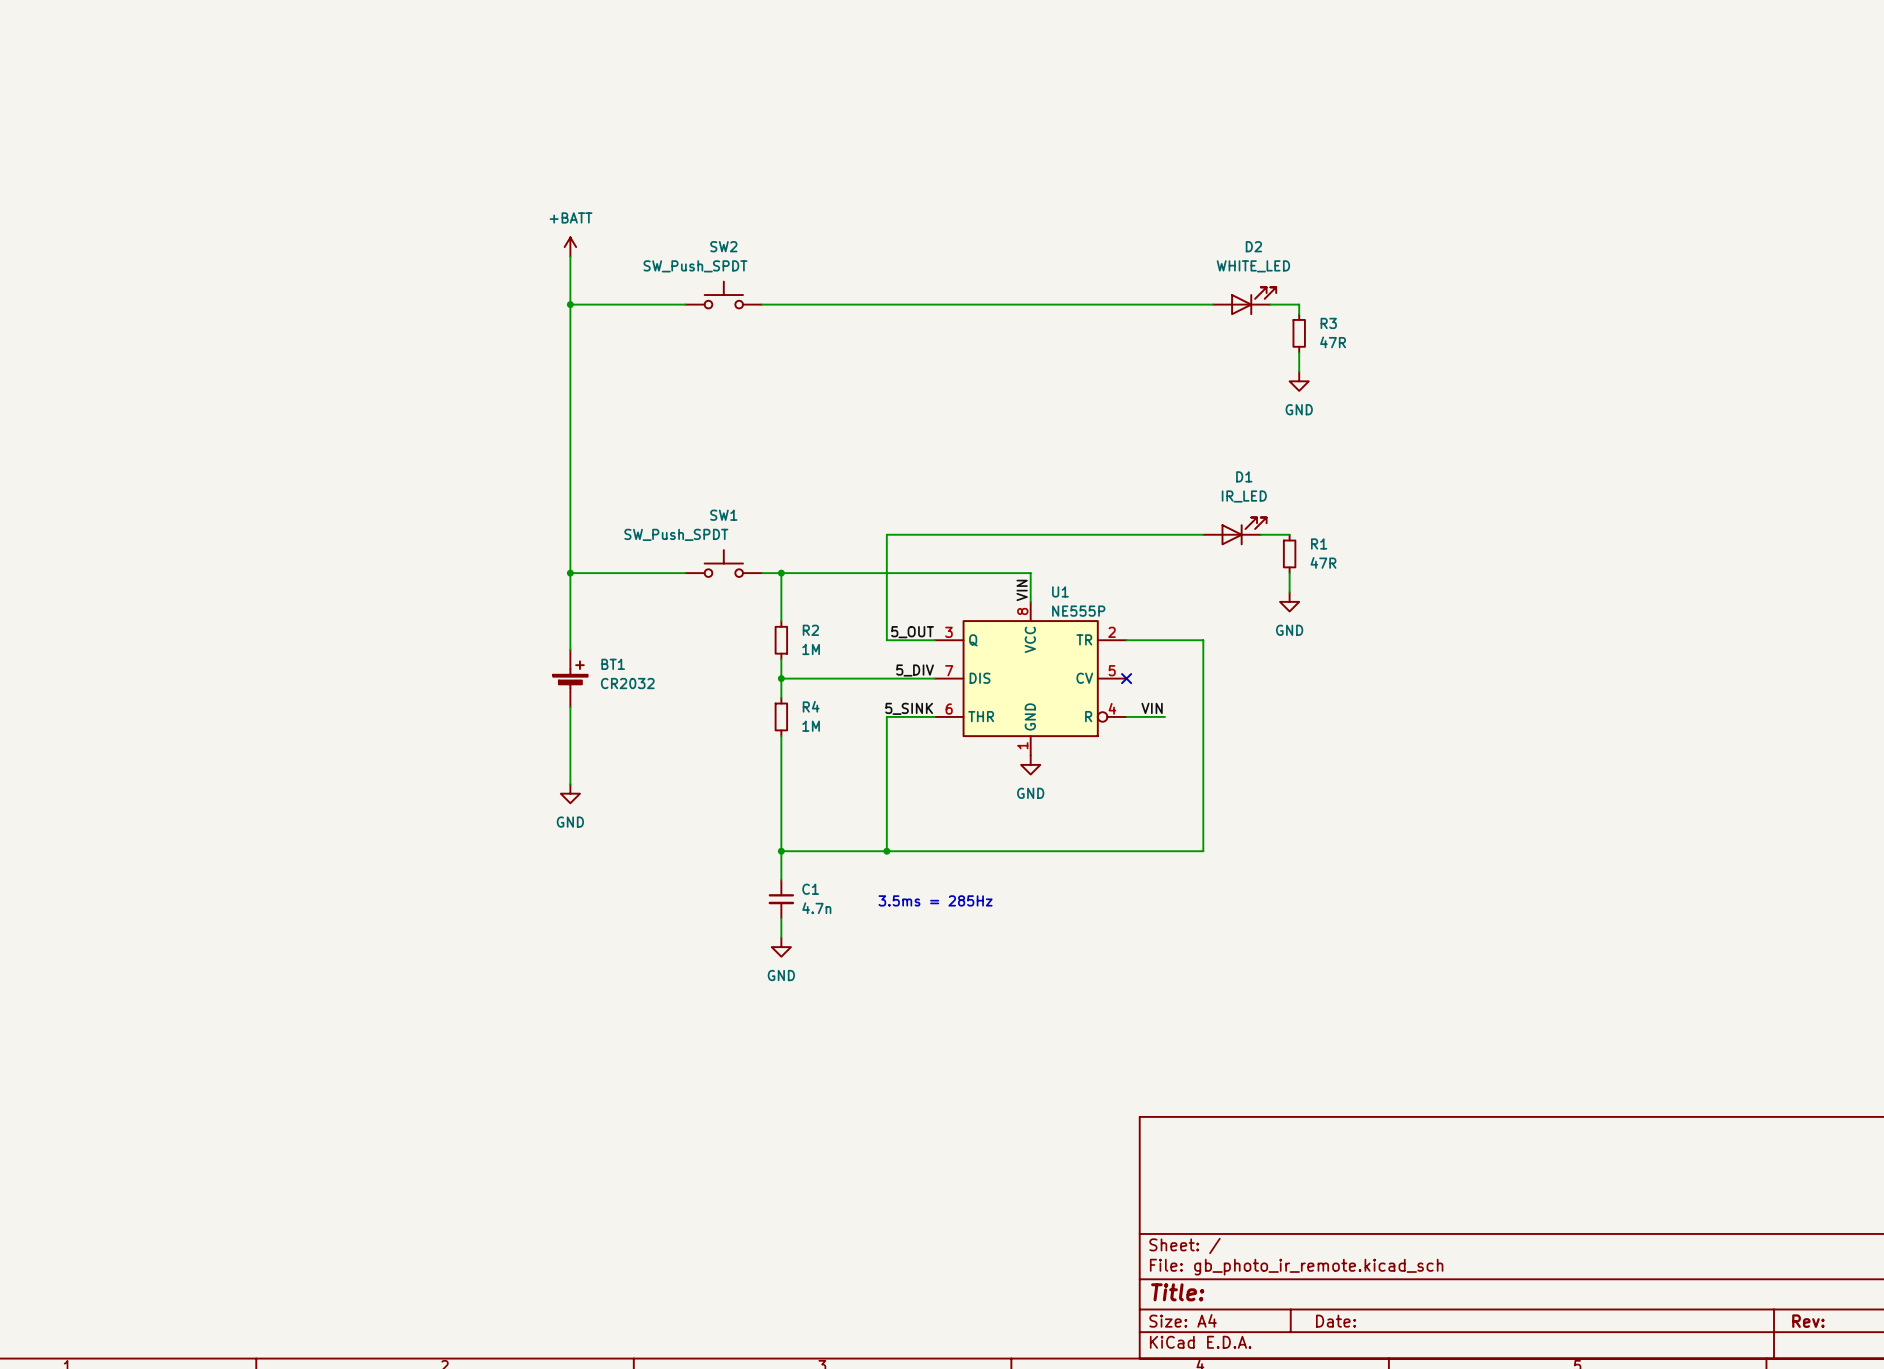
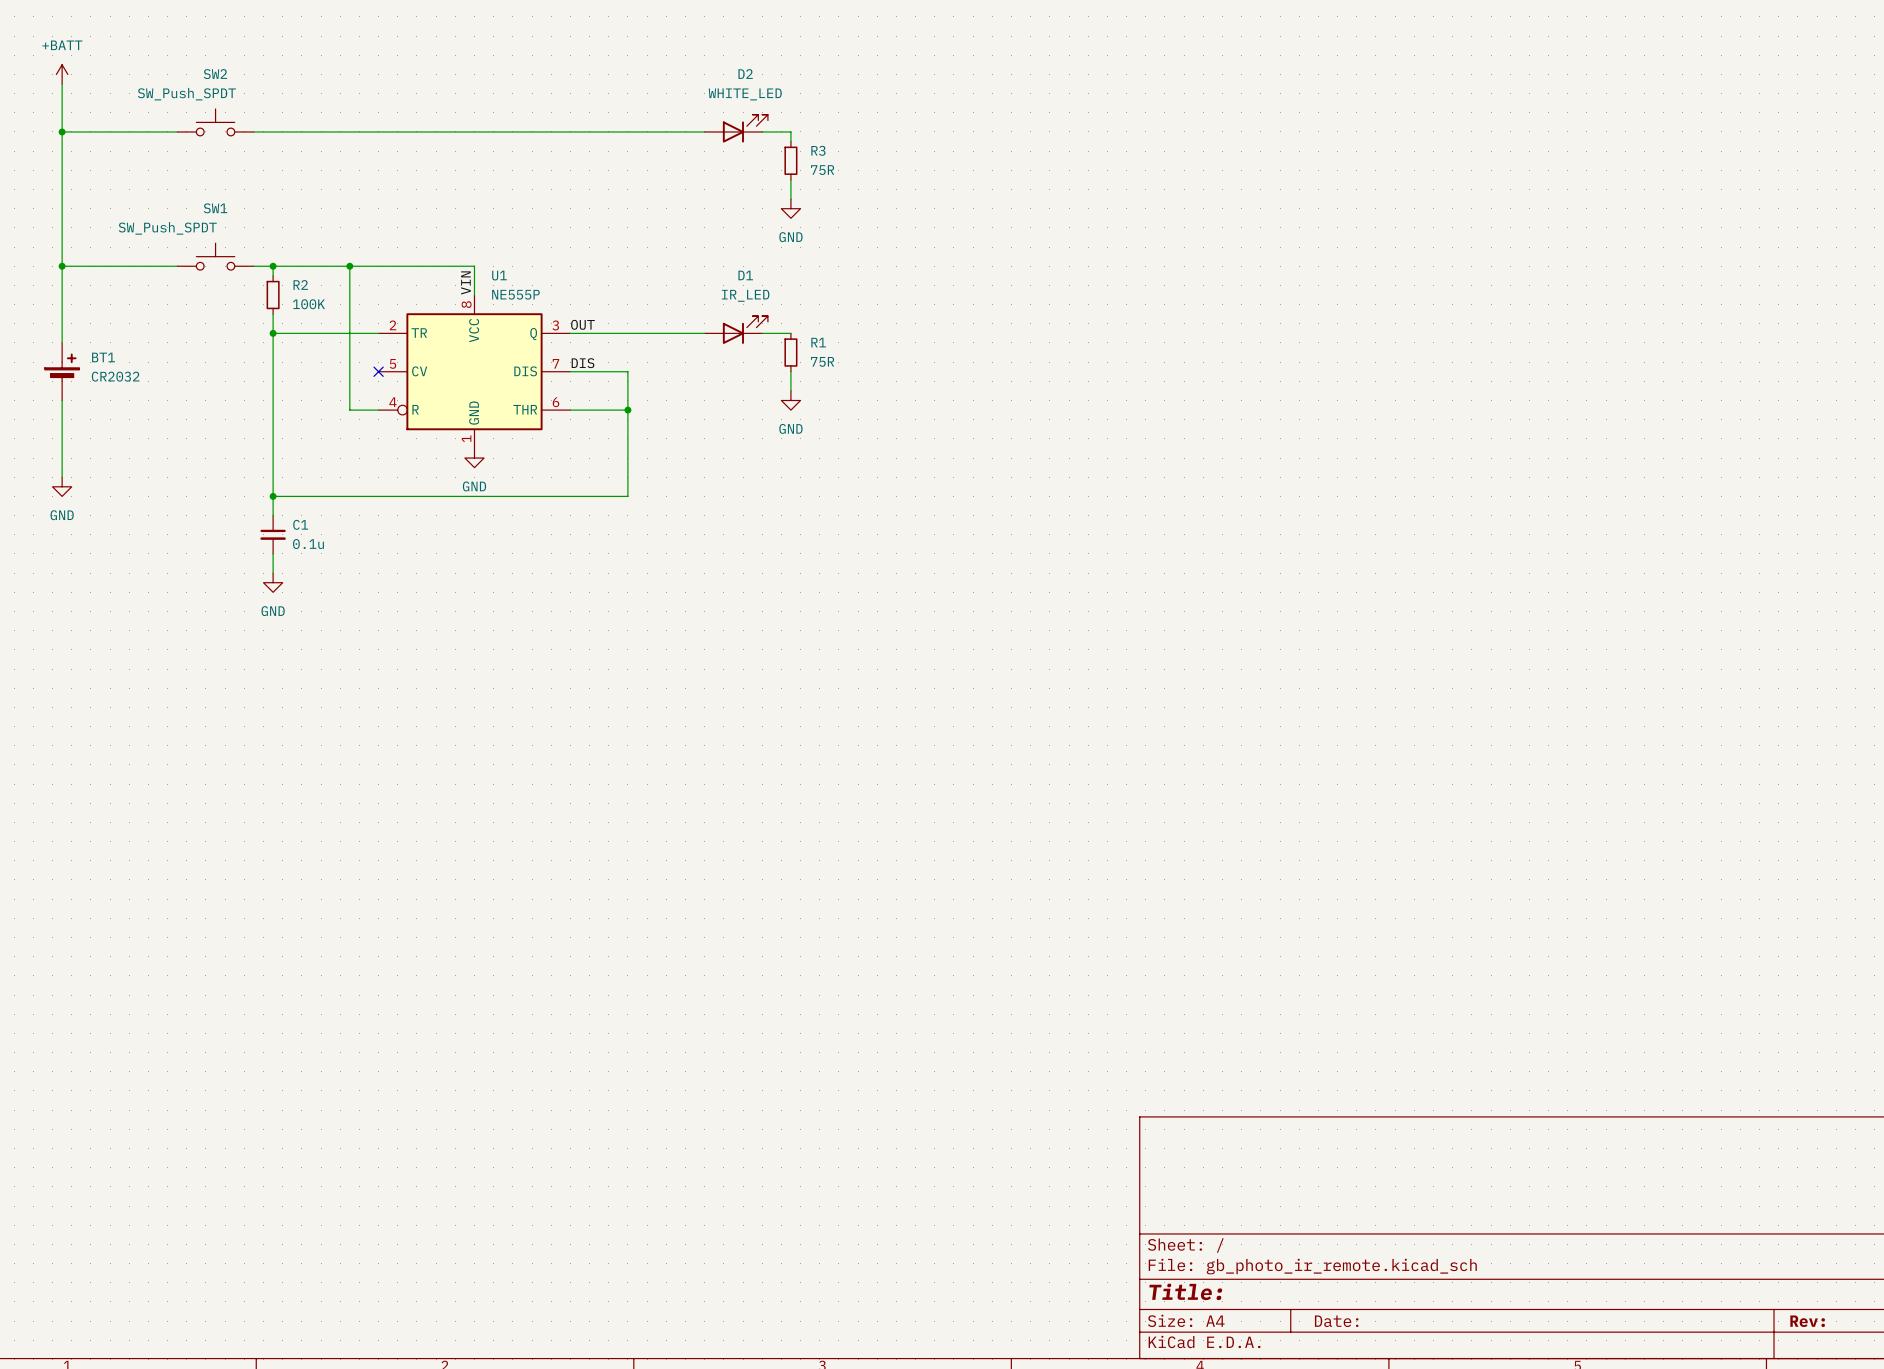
power symbol: none -> +BATT (62, 74)
wire: none -> (62, 84) (62, 342)
wire: none -> (62, 131) (177, 131)
junction: none -> (62, 131)
wire: none -> (253, 131) (704, 131)
wire: none -> (762, 131) (790, 131) (790, 141)
wire: none -> (790, 179) (790, 199)
power symbol: none -> GND (790, 208)
power symbol: +BATT (570, 247) -> none
wire: (570, 256) (570, 649) -> none
wire: none -> (62, 266) (177, 266)
junction: none -> (62, 266)
wire: none -> (253, 266) (474, 266) (474, 295)
wire: none -> (273, 266) (273, 275)
junction: none -> (273, 266)
wire: none -> (349, 266) (349, 410) (378, 410)
junction: none -> (349, 266)
label: none -> VIN (465, 282)
SW2 position: (723, 295) -> (215, 122)
D2 position: (1244, 301) -> (736, 128)
wire: (570, 304) (685, 304) -> none
junction: (570, 304) -> none
wire: (762, 304) (1212, 304) -> none
wire: (1270, 304) (1299, 304) (1299, 314) -> none
wire: none -> (273, 314) (273, 515)
label: none -> OUT (582, 324)
wire: none -> (273, 333) (378, 333)
junction: none -> (273, 333)
wire: none -> (570, 333) (704, 333)
wire: none -> (762, 333) (790, 333)
R3 position: (1299, 333) -> (790, 160)
R3 value: 47R (1333, 342) -> 75R (822, 170)
wire: (1299, 352) (1299, 371) -> none
label: none -> DIS (583, 363)
no-connect mark: none -> (378, 371)
wire: none -> (570, 371) (627, 371) (627, 496) (273, 496)
wire: none -> (790, 371) (790, 390)
power symbol: GND (1299, 381) -> none
wire: none -> (62, 400) (62, 477)
power symbol: none -> GND (790, 400)
wire: none -> (570, 410) (627, 410)
junction: none -> (627, 410)
power symbol: none -> GND (474, 458)
power symbol: none -> GND (62, 486)
junction: none -> (273, 496)
D1 position: (1234, 531) -> (736, 330)
wire: (1203, 534) (886, 534) (886, 640) (934, 640) -> none
wire: (1260, 534) (1289, 534) -> none
wire: none -> (273, 553) (273, 573)
R1 position: (1289, 553) -> (790, 352)
R1 value: 47R (1323, 562) -> 75R (822, 361)
SW1 position: (723, 563) -> (215, 256)
wire: (570, 573) (685, 573) -> none
junction: (570, 573) -> none
wire: (762, 573) (1030, 573) (1030, 601) -> none
wire: (781, 573) (781, 621) -> none
junction: (781, 573) -> none
wire: (1289, 573) (1289, 592) -> none
power symbol: none -> GND (273, 582)
label: VIN (1022, 590) -> none
power symbol: GND (1289, 601) -> none
label: 5_OUT (912, 632) -> none
R2 position: (781, 640) -> (273, 295)
wire: (1126, 640) (1203, 640) (1203, 851) (781, 851) -> none
R2 value: 1M (811, 649) -> 100K (308, 304)
wire: (781, 659) (781, 697) -> none
label: 5_DIV (915, 670) -> none
BT1 position: (570, 678) -> (62, 371)
wire: (781, 678) (934, 678) -> none
junction: (781, 678) -> none
U1 flip: as is (1030, 678) -> left-right (474, 371)
U1 position: (1030, 678) -> (474, 371)
no-connect mark: (1126, 678) -> none
wire: (570, 707) (570, 784) -> none
label: 5_SINK (909, 708) -> none
label: VIN (1152, 708) -> none
R4: 1M (781, 716) -> none
wire: (934, 716) (886, 716) (886, 851) -> none
wire: (1126, 716) (1164, 716) -> none
wire: (781, 736) (781, 879) -> none
power symbol: GND (1030, 764) -> none
power symbol: GND (570, 793) -> none
junction: (781, 851) -> none
junction: (886, 851) -> none
C1 position: (781, 899) -> (273, 534)
text: 3.5ms = 285Hz (935, 900) -> none
C1 value: 4.7n (816, 908) -> 0.1u (308, 544)
wire: (781, 918) (781, 937) -> none
power symbol: GND (781, 947) -> none

